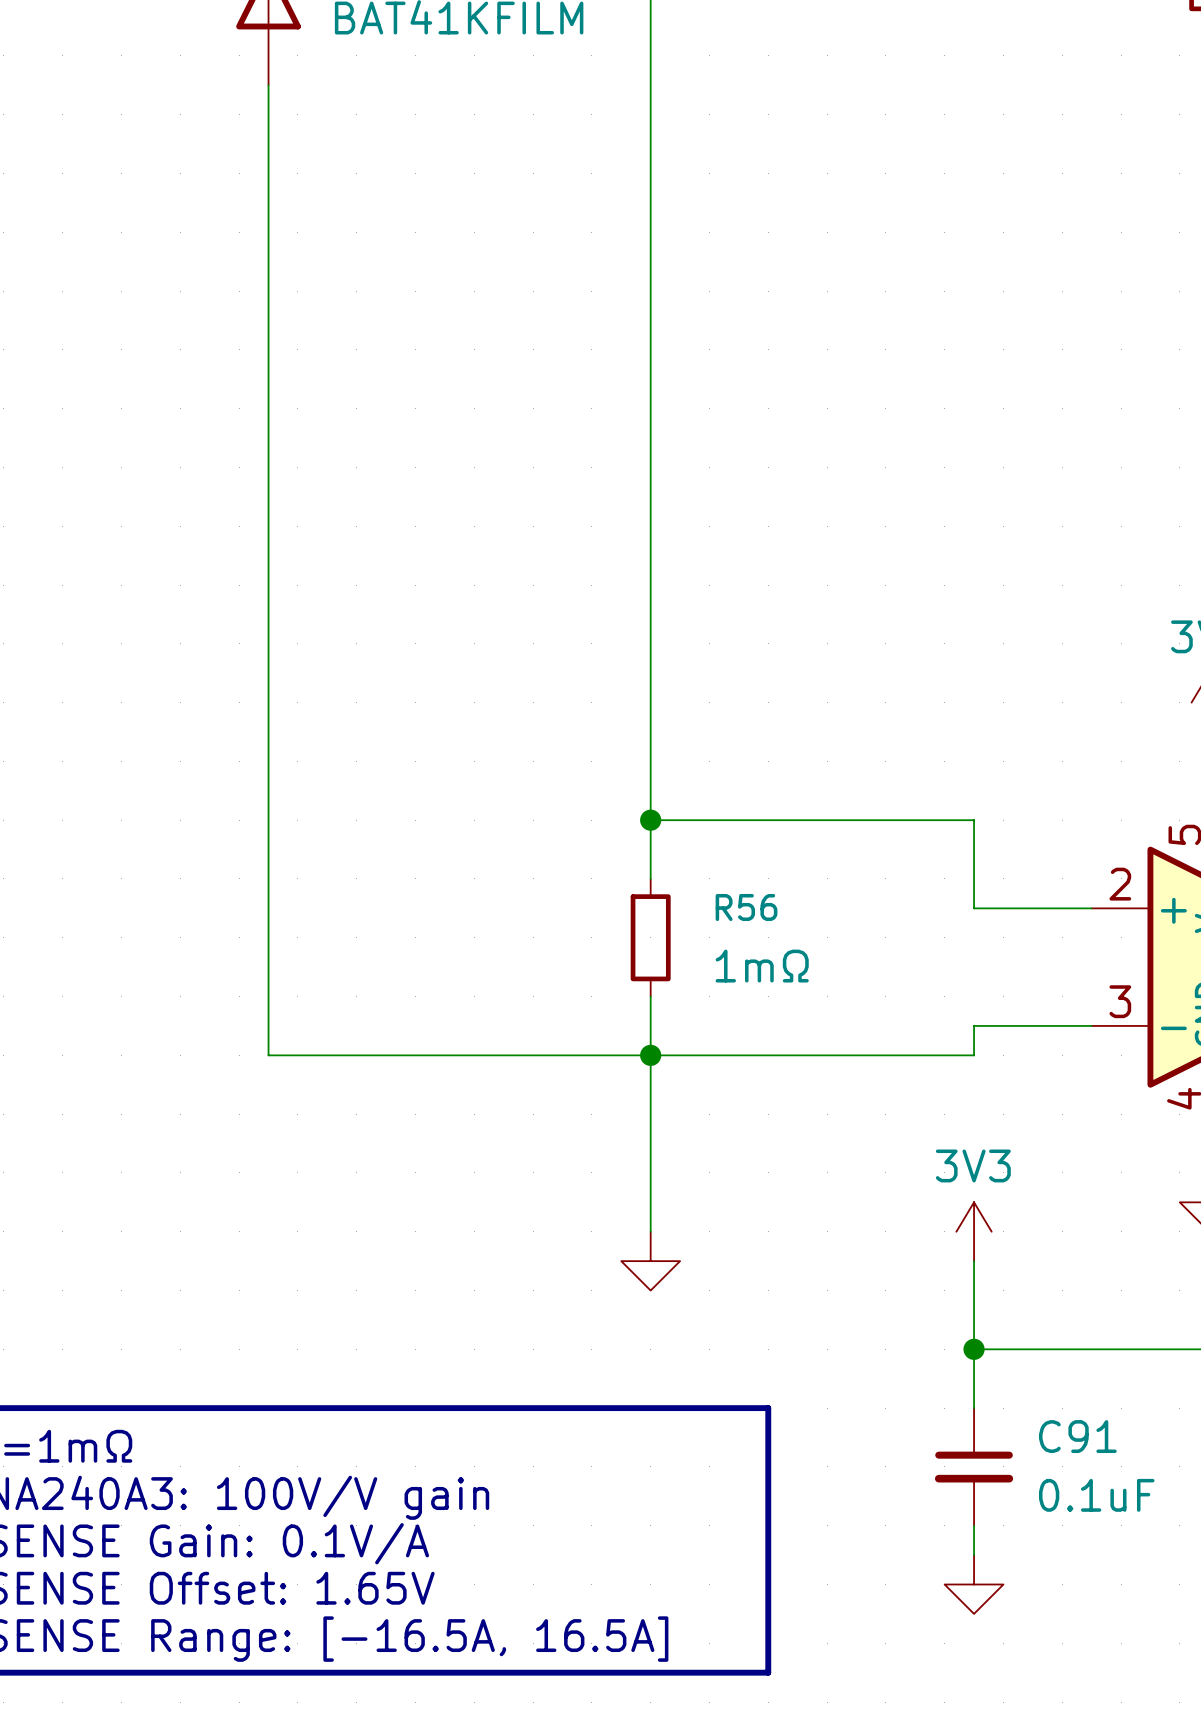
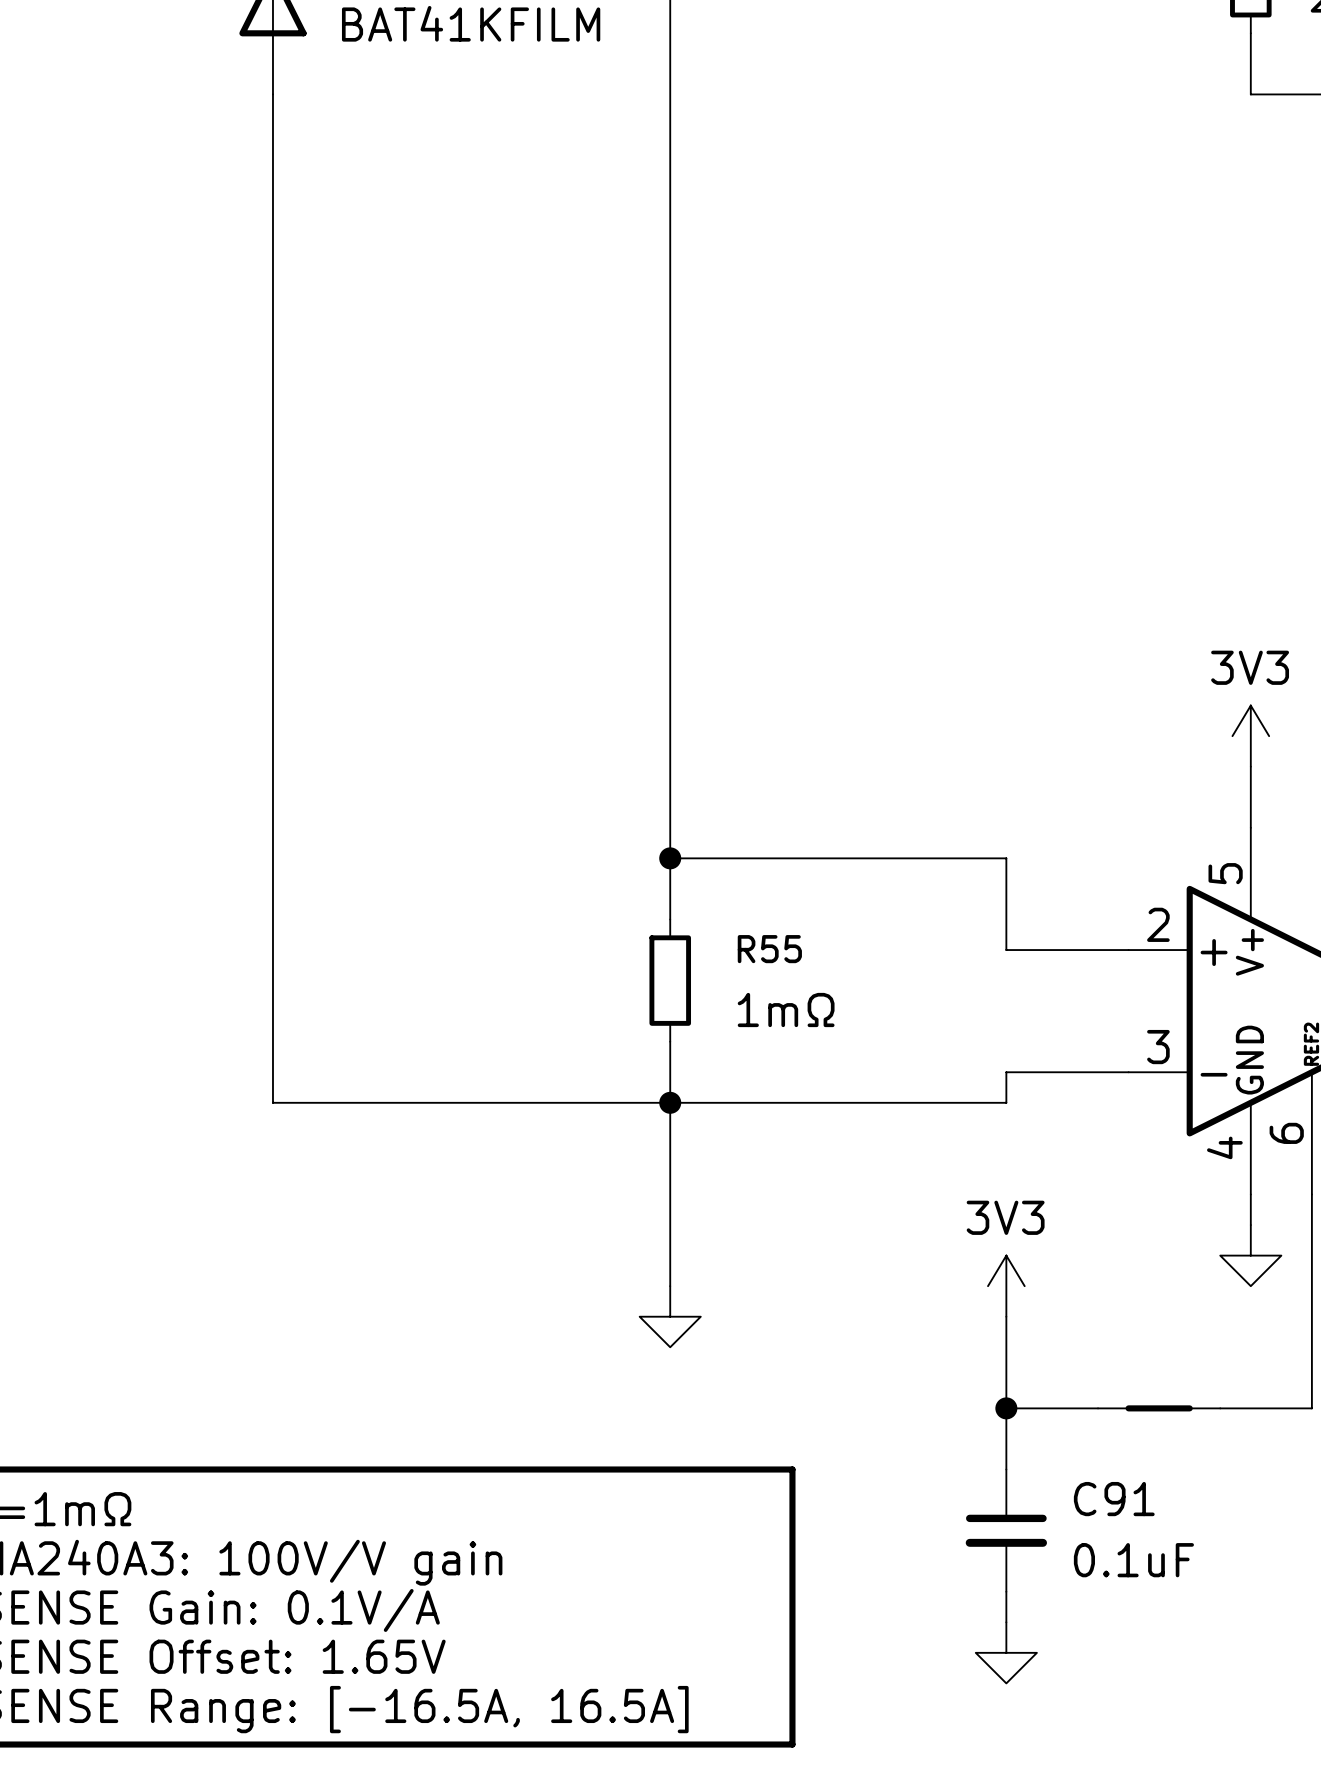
R56 name: R56 (746, 907) -> R55 (769, 949)
part: none -> (1159, 1408)

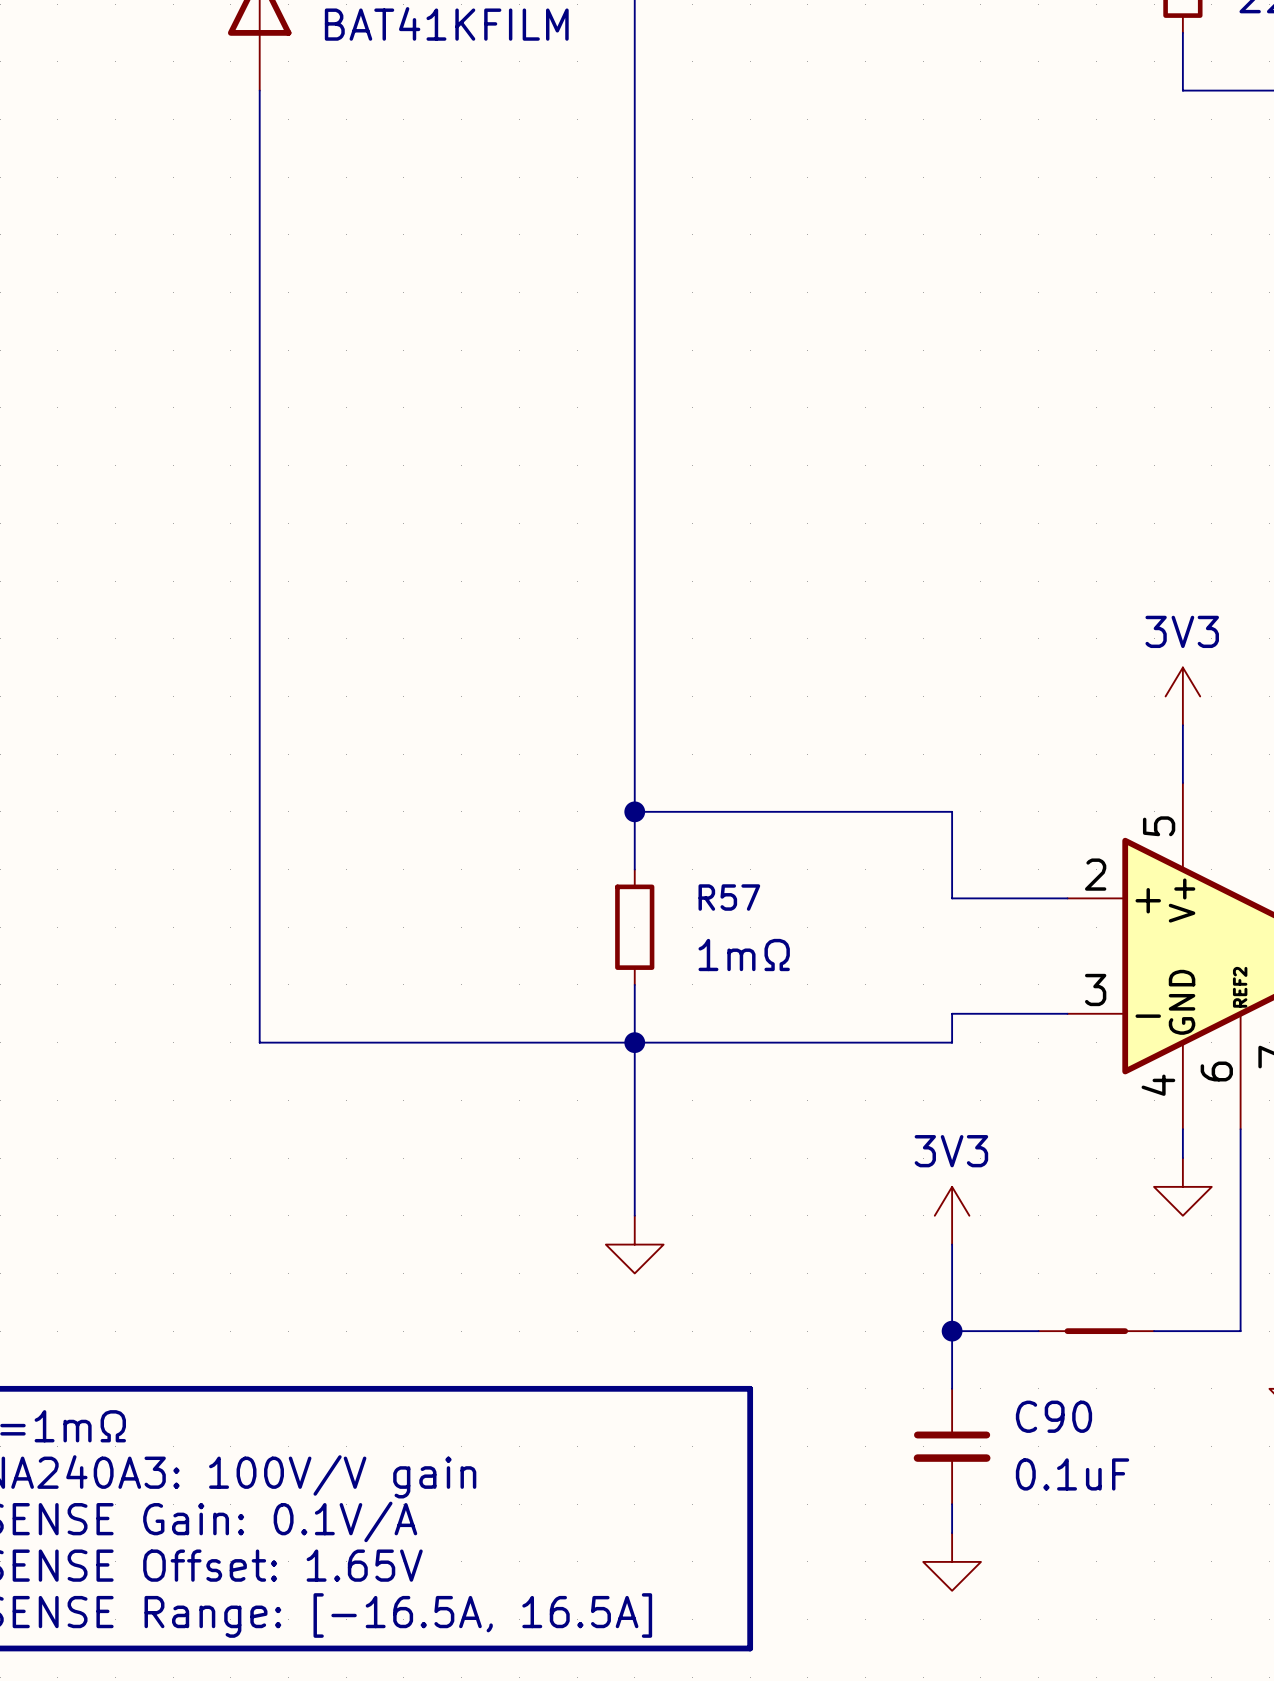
R55 name: R55 (769, 949) -> R57 (729, 897)
C91 name: C91 (1114, 1499) -> C90 (1053, 1416)

